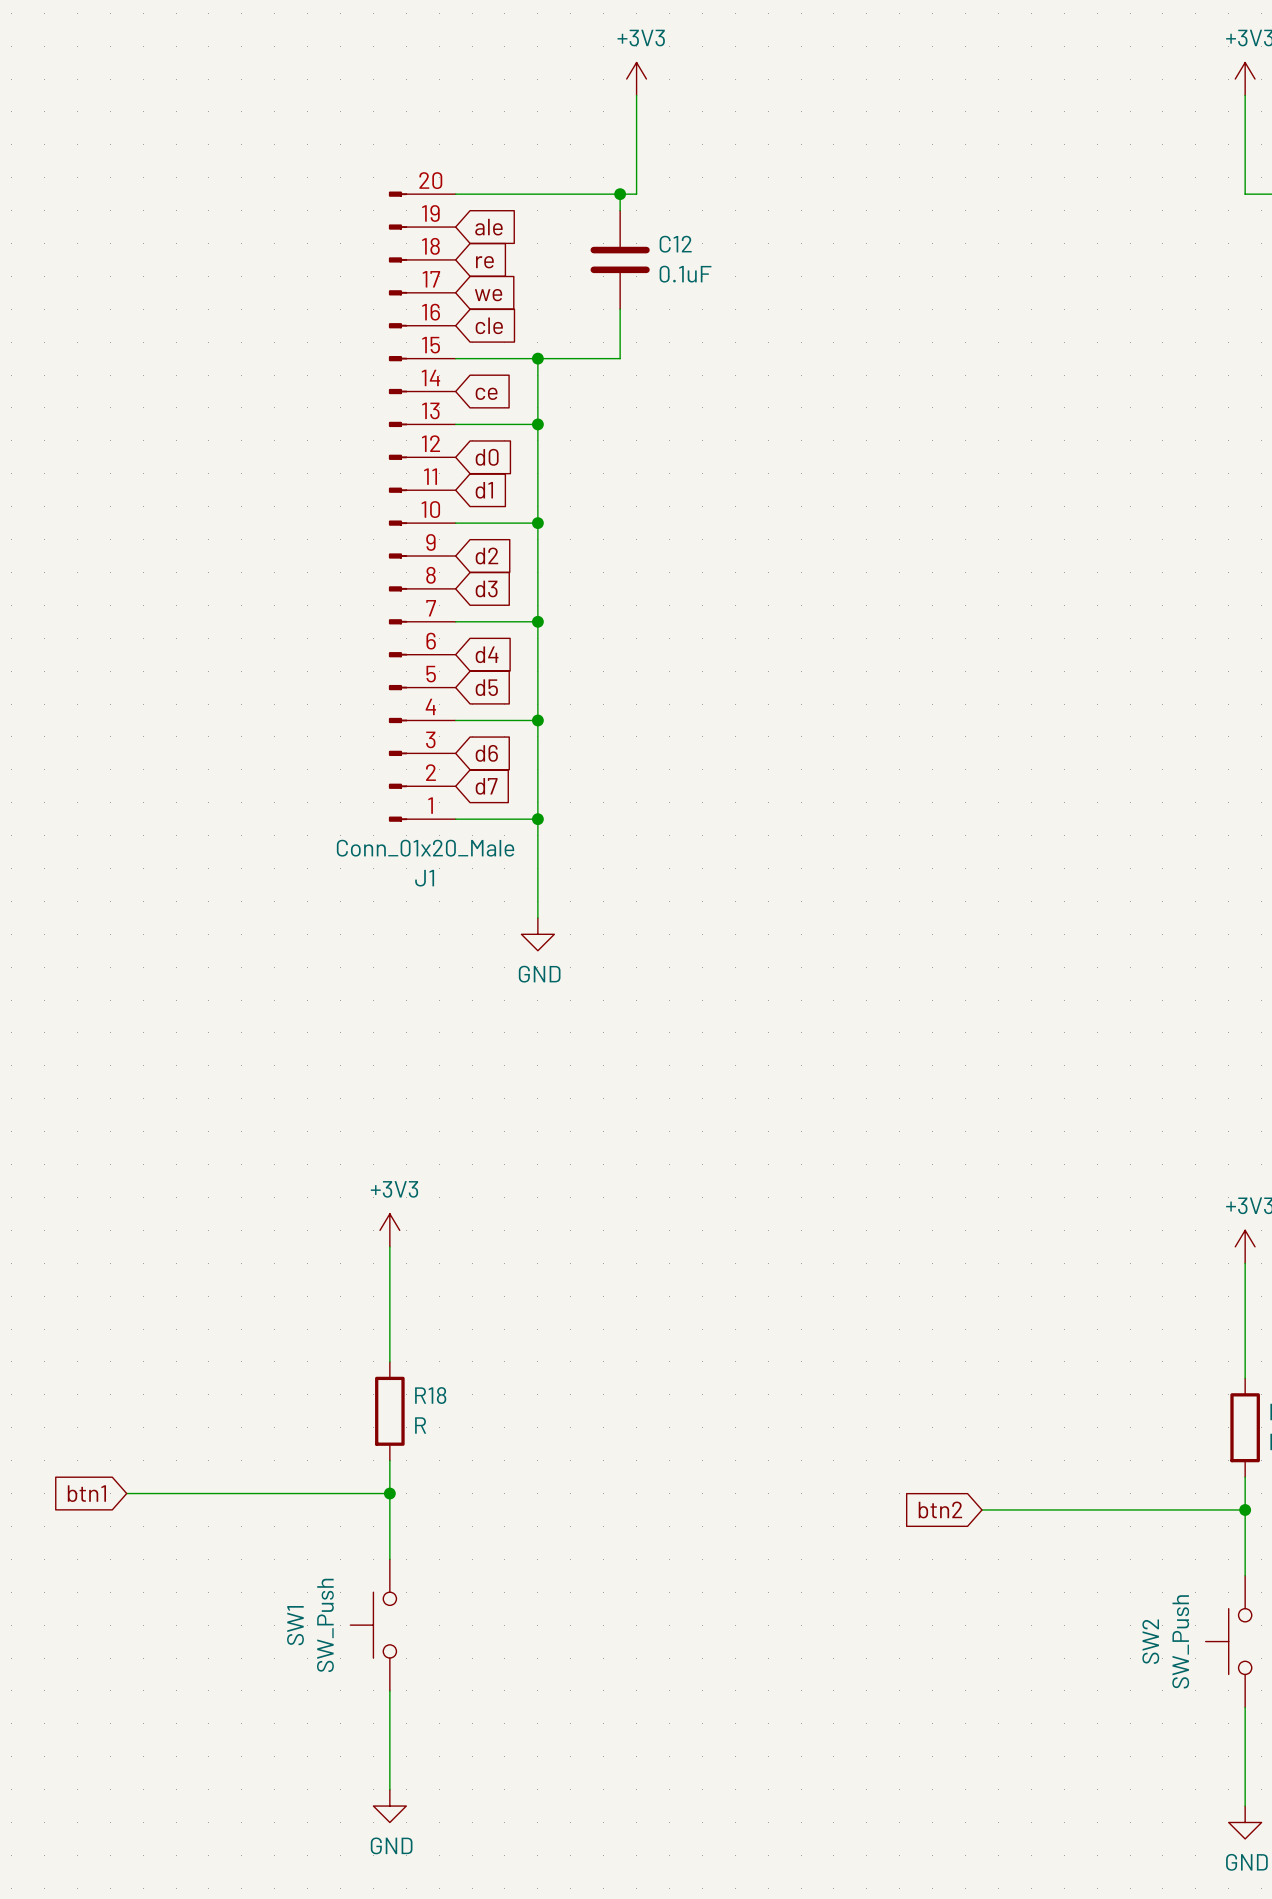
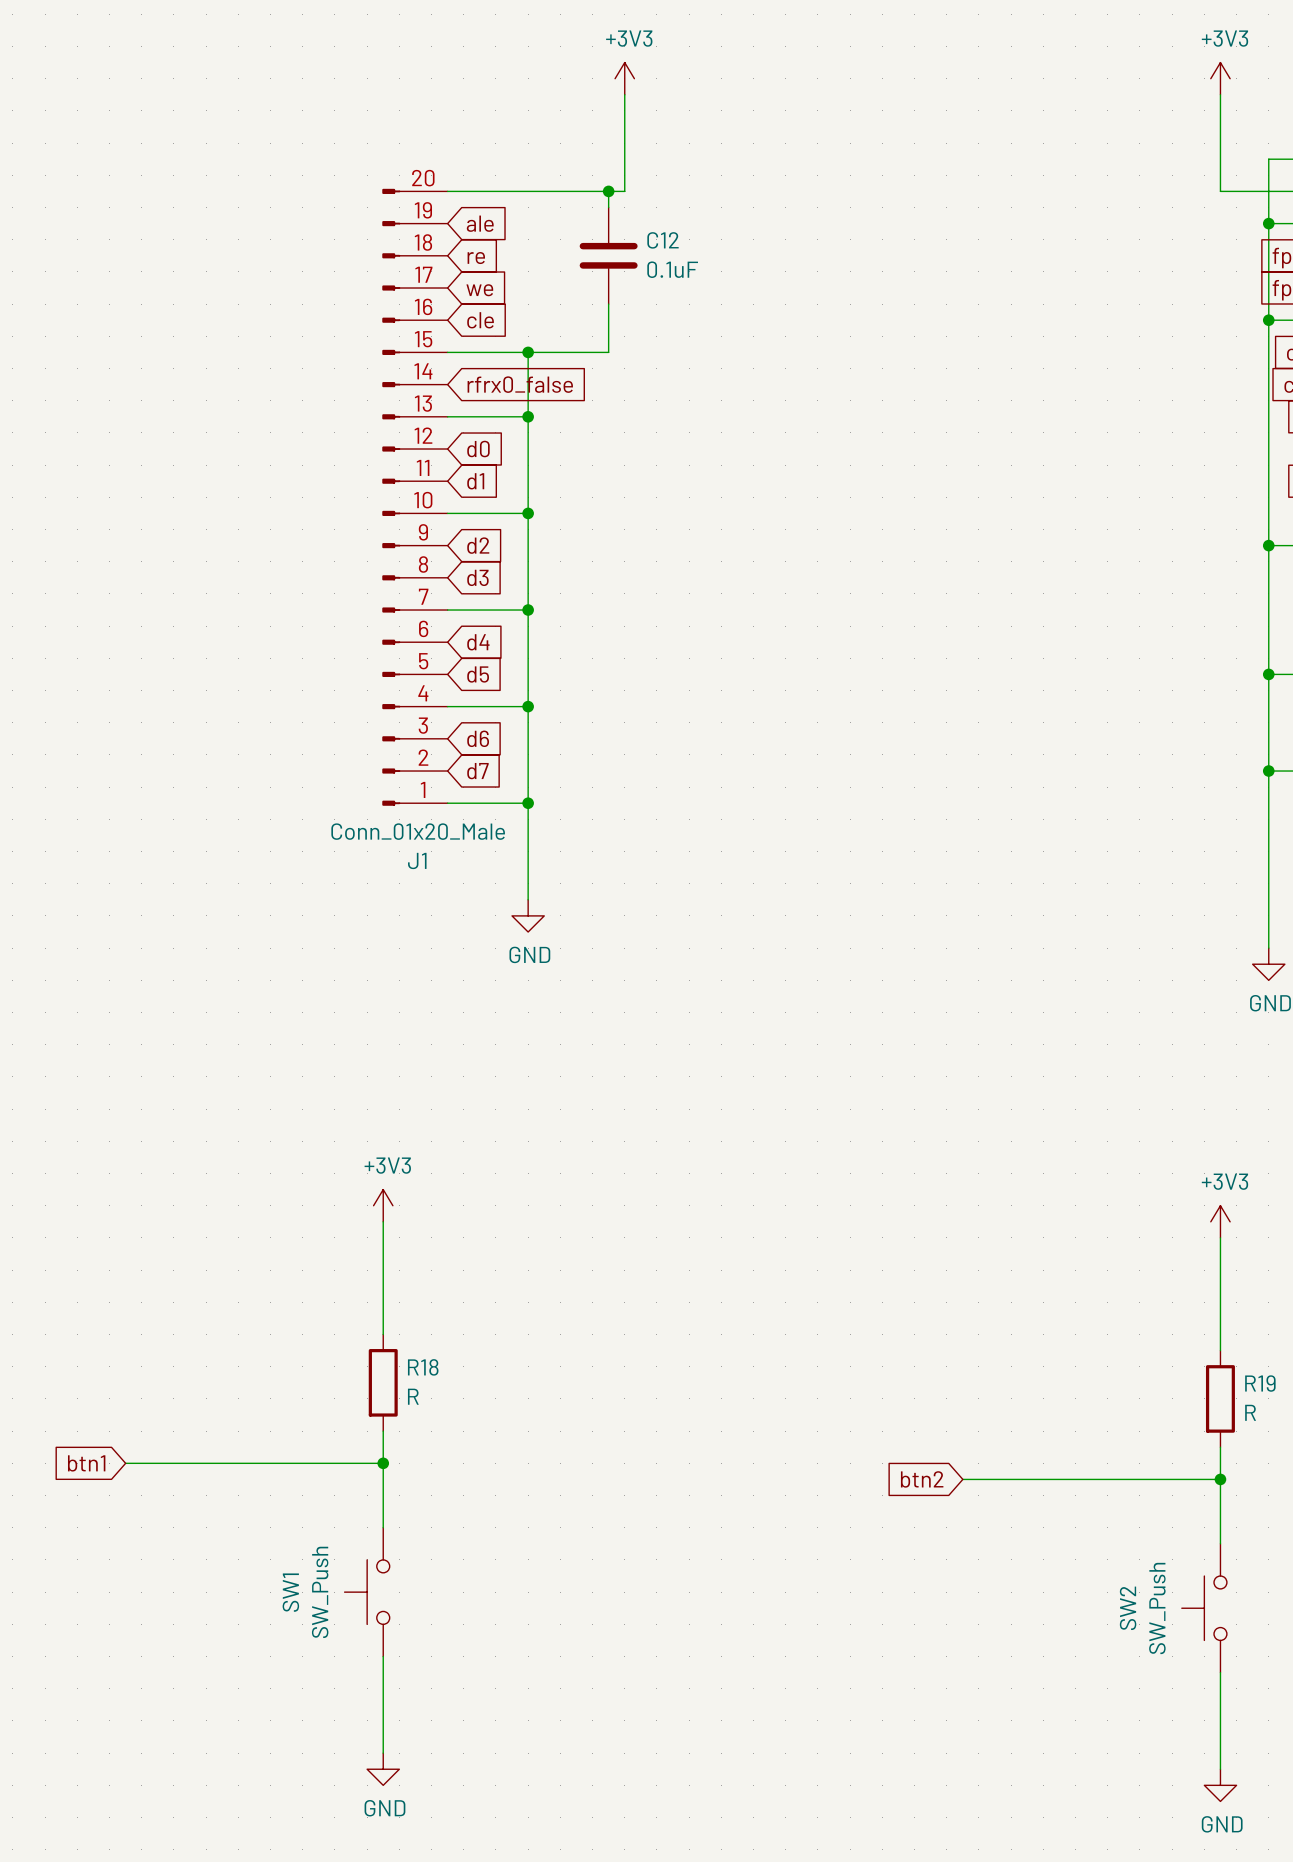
global label: ce (486, 393) -> rfrx0_false (520, 384)

